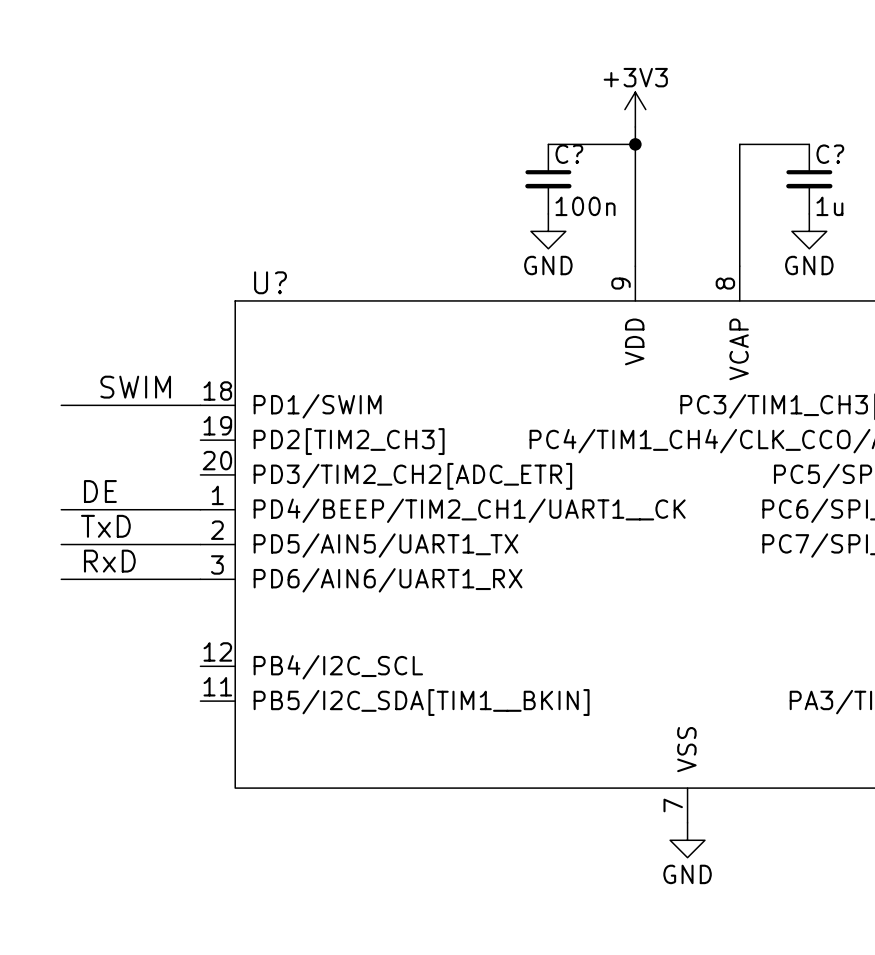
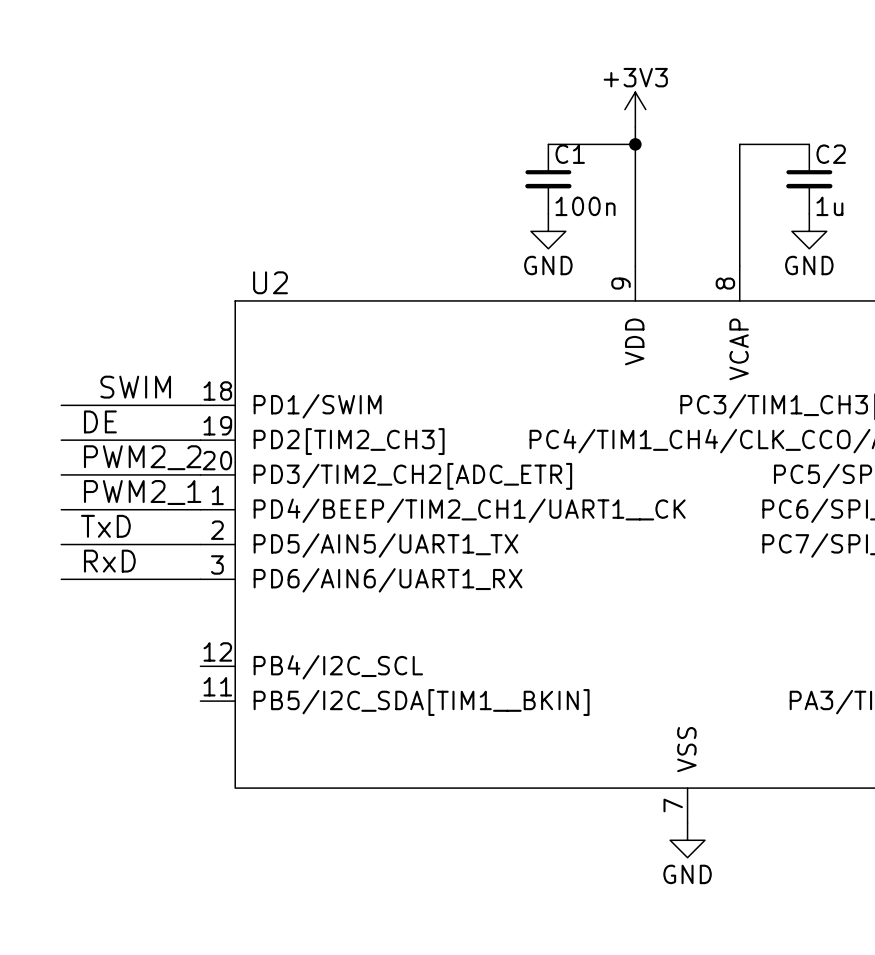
C? name: C? (569, 154) -> C1 (570, 154)
C? name: C? (830, 154) -> C2 (831, 154)
U? name: U? (270, 282) -> U2 (270, 282)
label: none -> DE (100, 421)
wire: none -> (61, 440) (200, 440)
label: none -> PWM2_2 (142, 457)
wire: none -> (61, 474) (200, 474)
label: DE (100, 491) -> PWM2_1 (142, 492)

